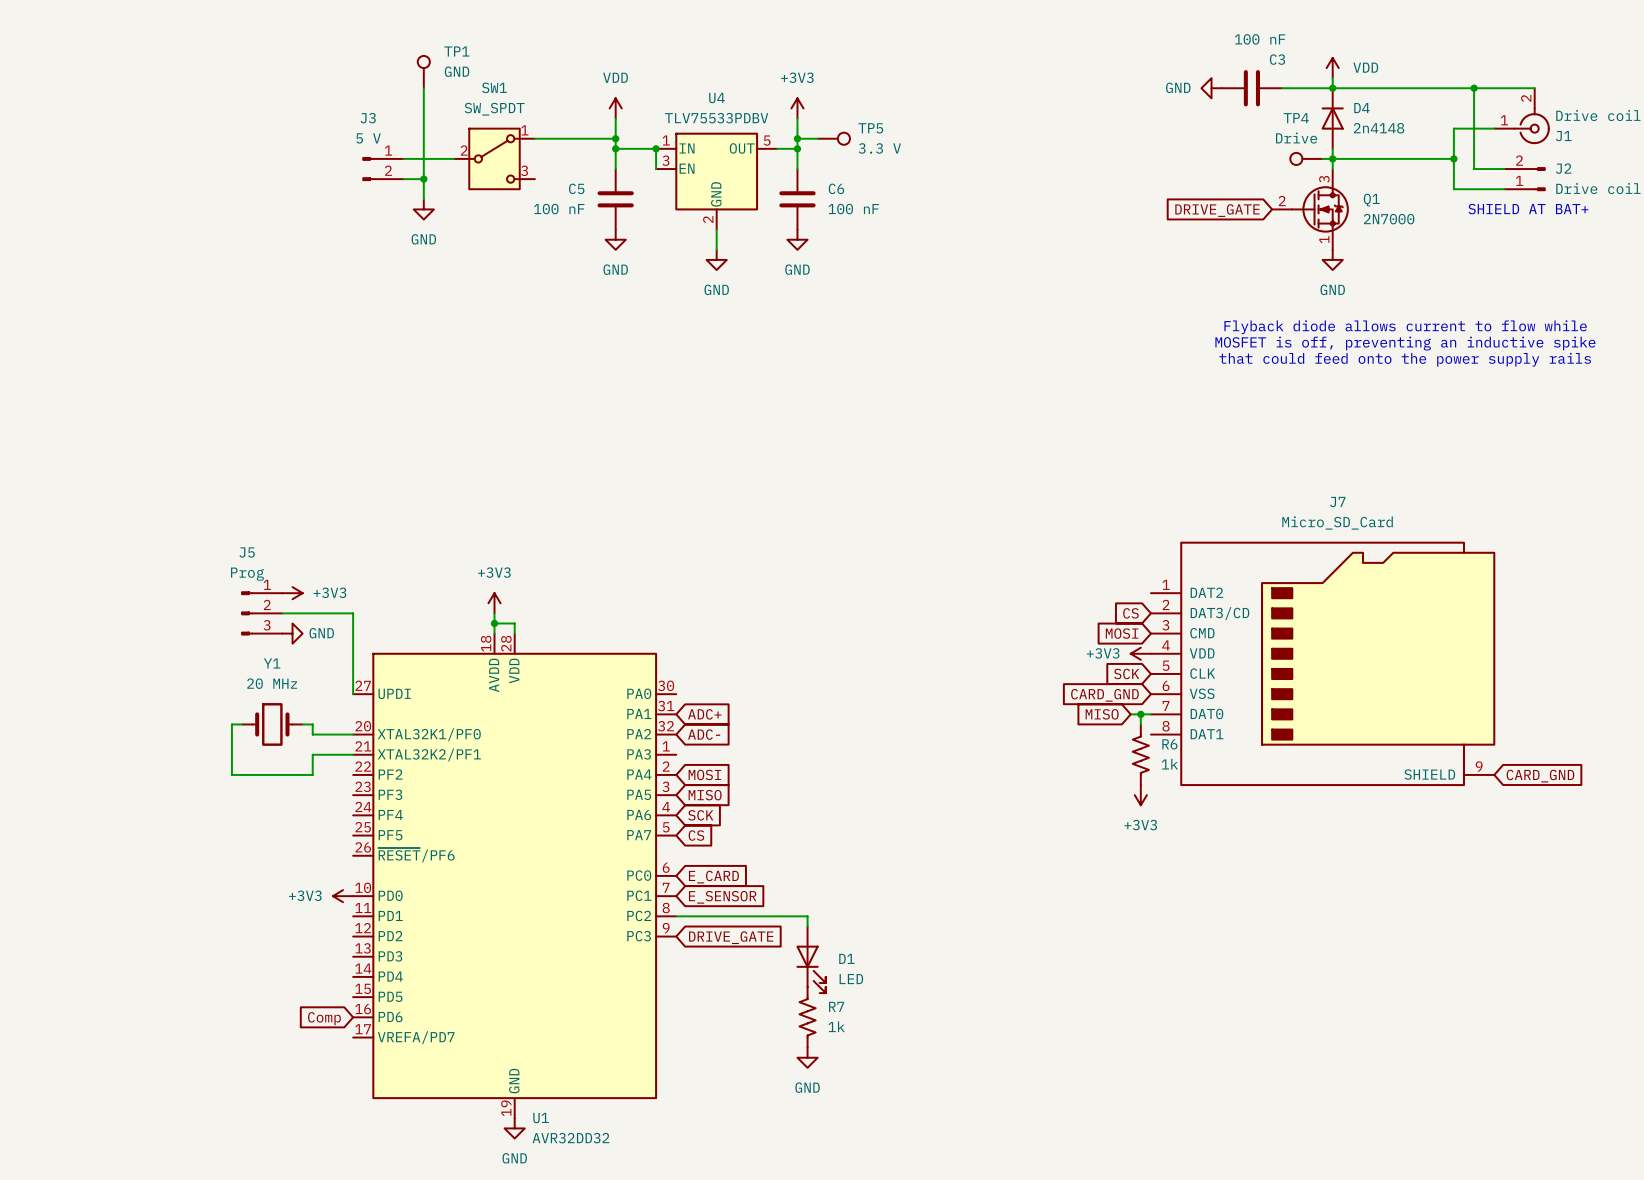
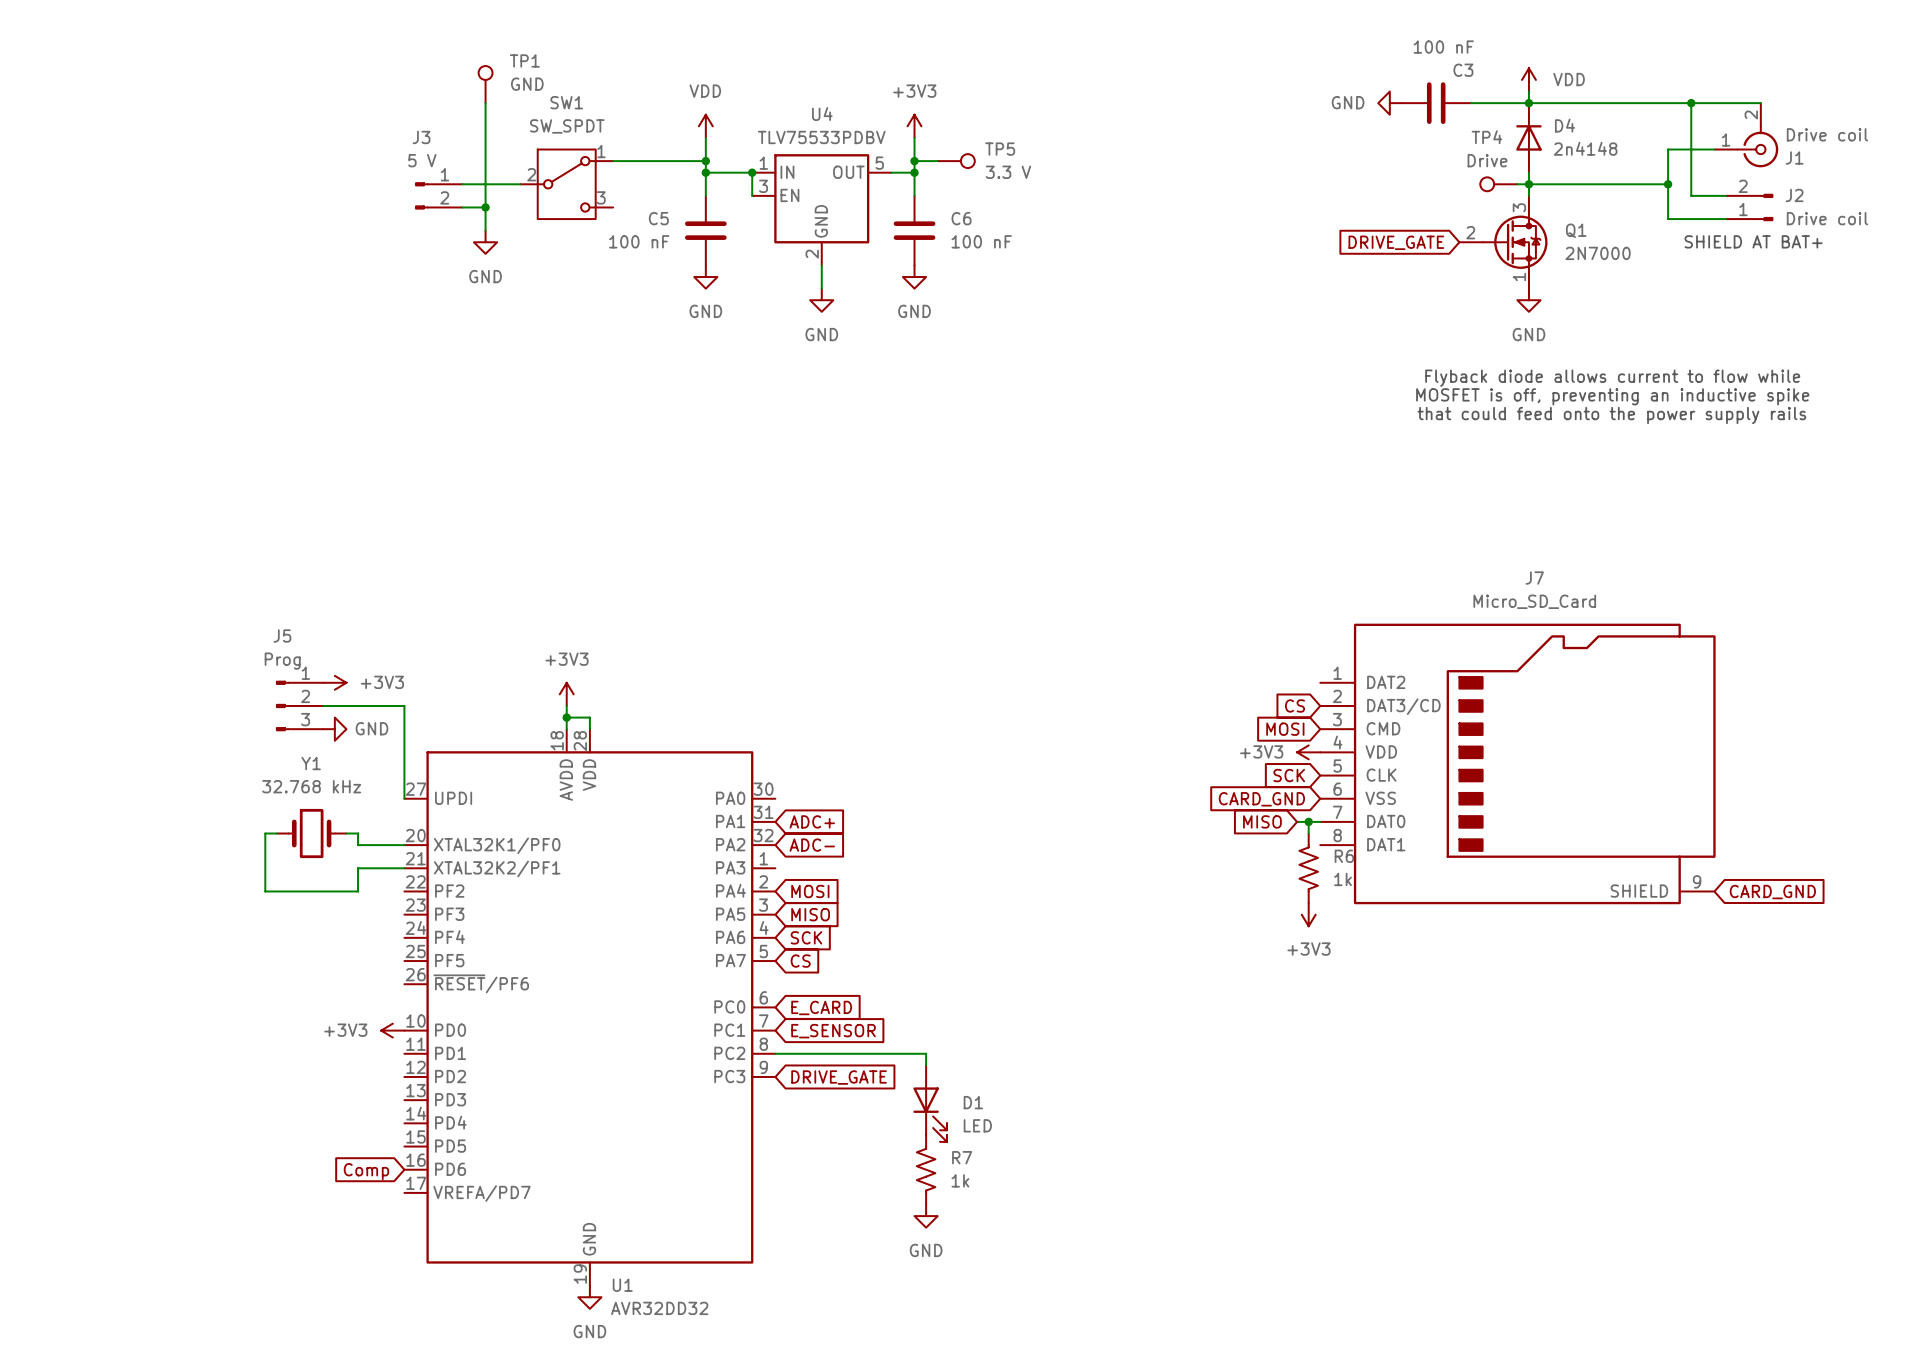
Y1 value: 20 MHz (272, 683) -> 32.768 kHz (311, 786)

